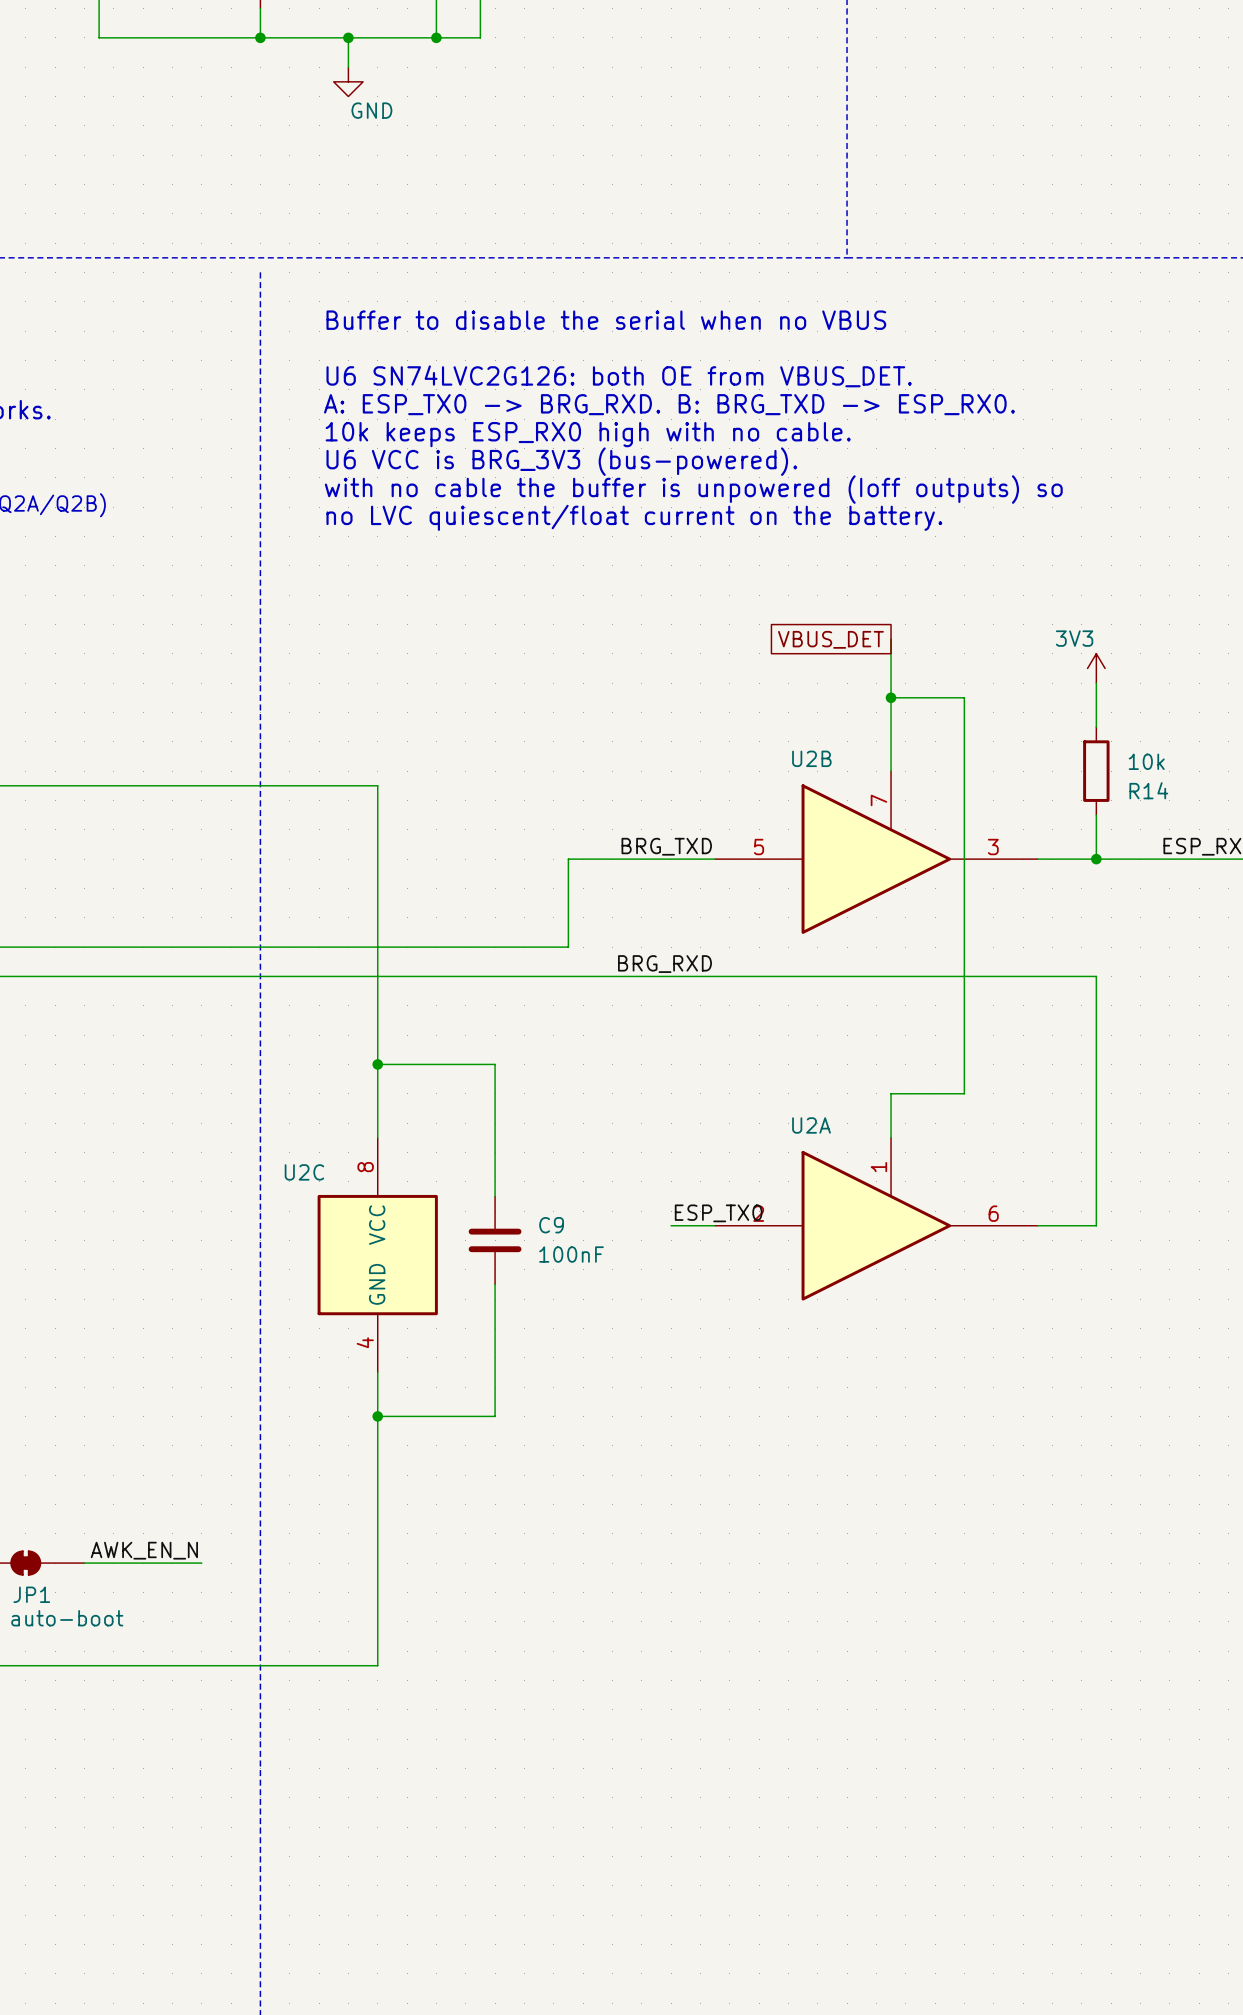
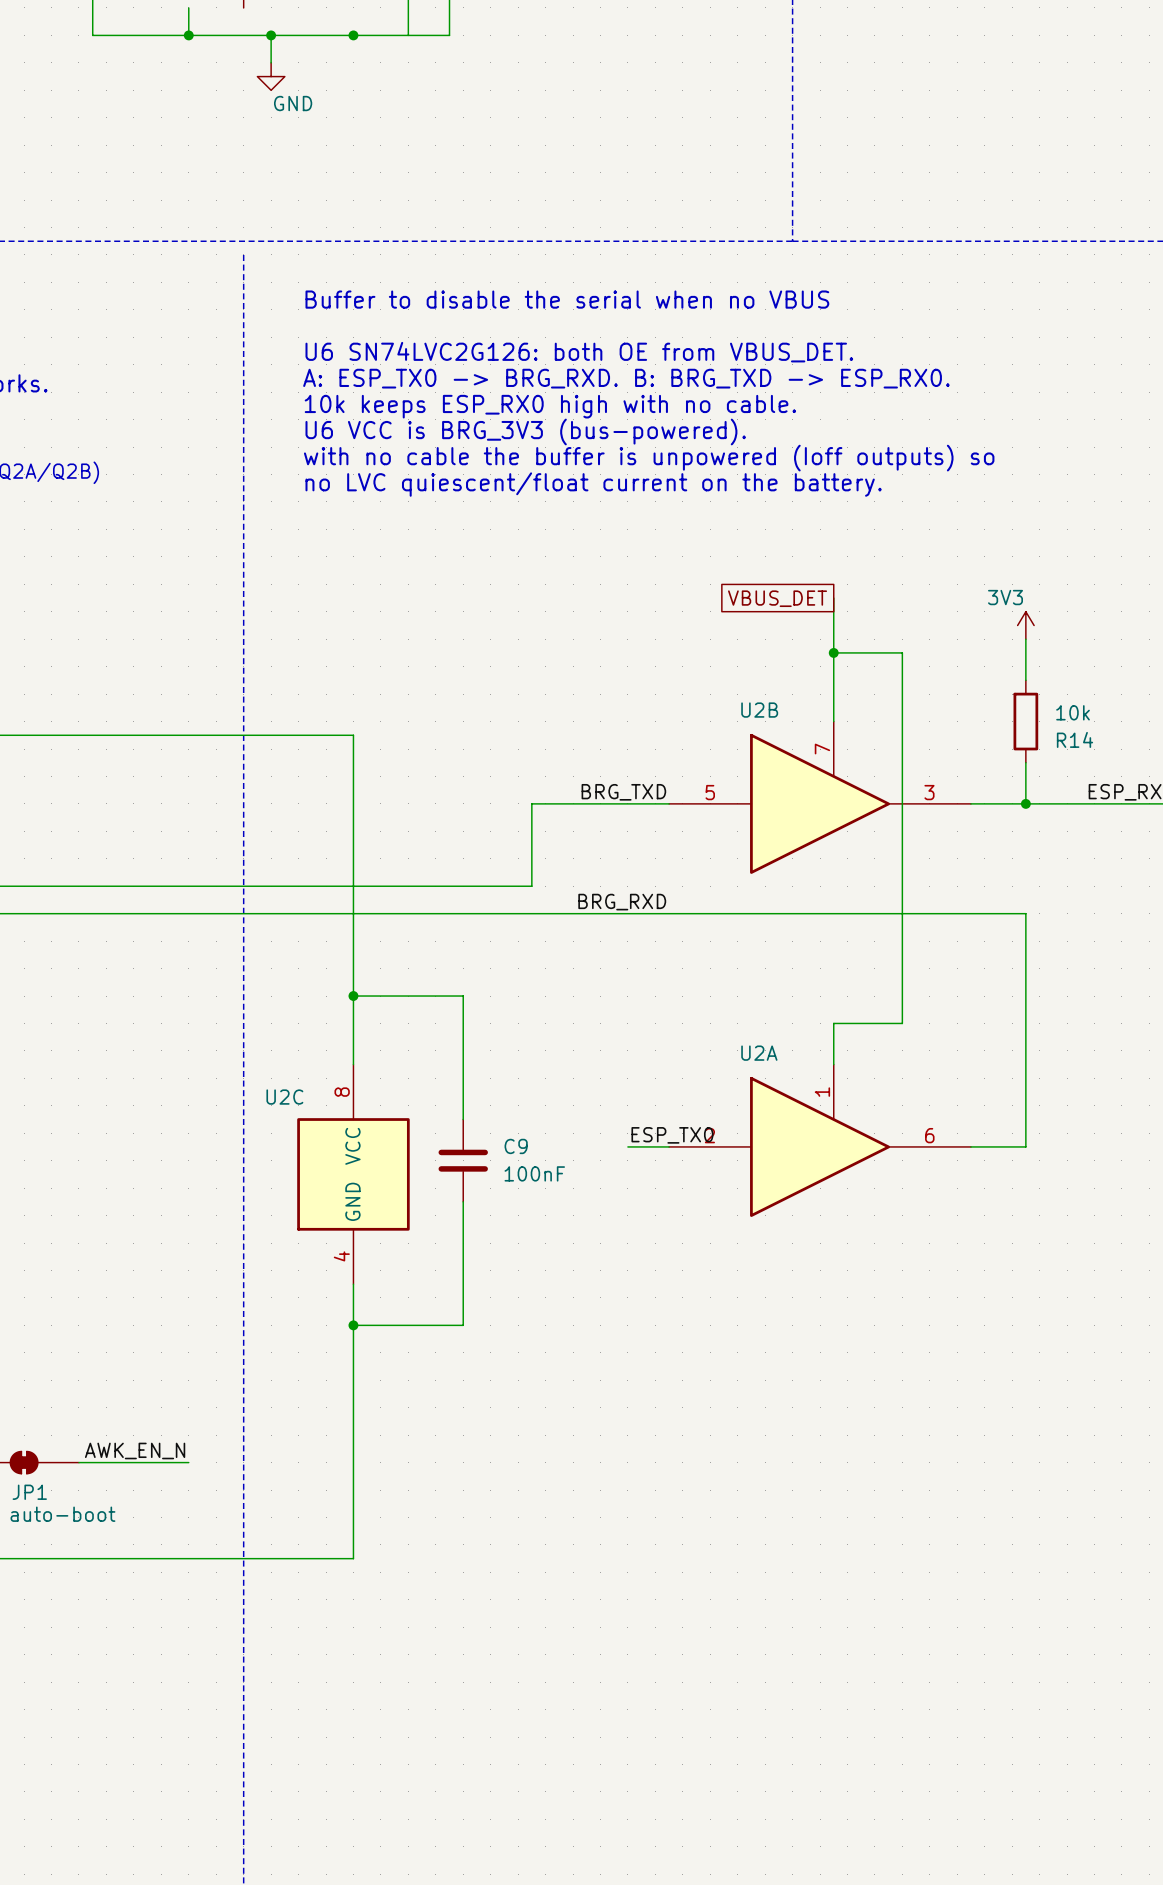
wire: (260, 8) (260, 37) -> (188, 7) (188, 35)
junction: none -> (188, 35)
junction: (260, 37) -> none
junction: none -> (271, 35)
wire: (348, 37) (348, 67) -> (271, 35) (271, 62)
junction: (348, 37) -> none
junction: none -> (353, 35)
junction: (436, 37) -> none
power symbol position: GND (348, 81) -> GND (271, 76)

